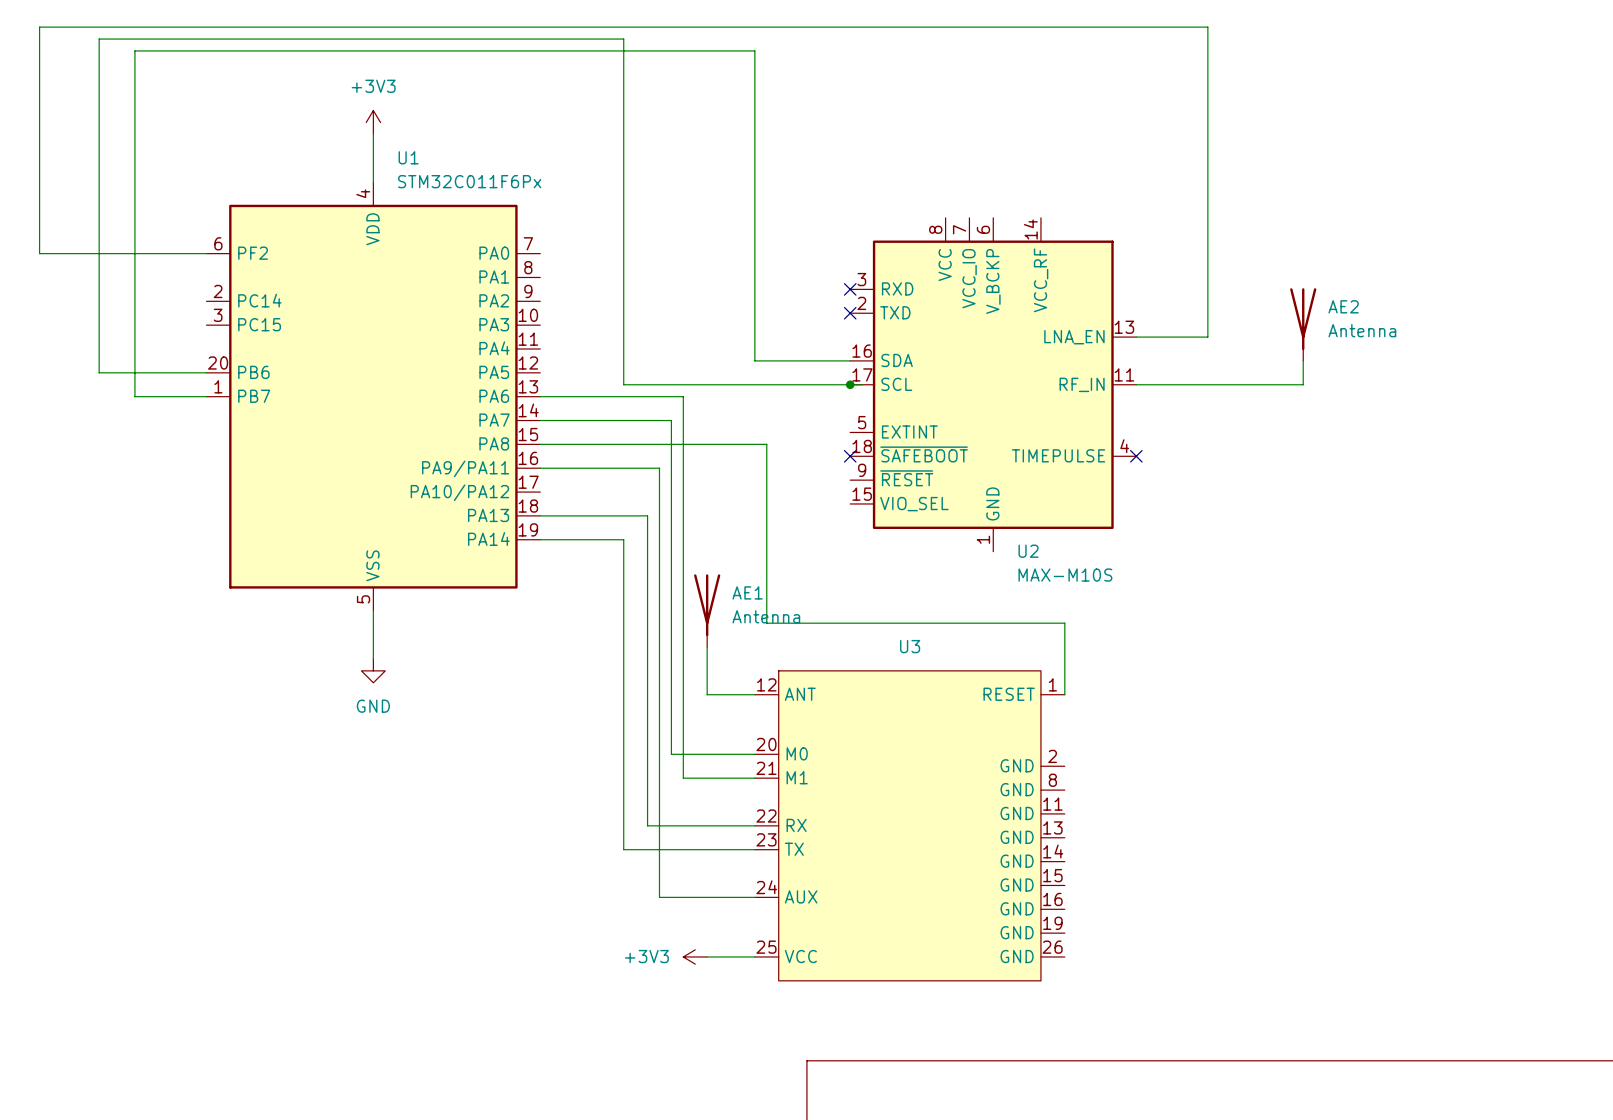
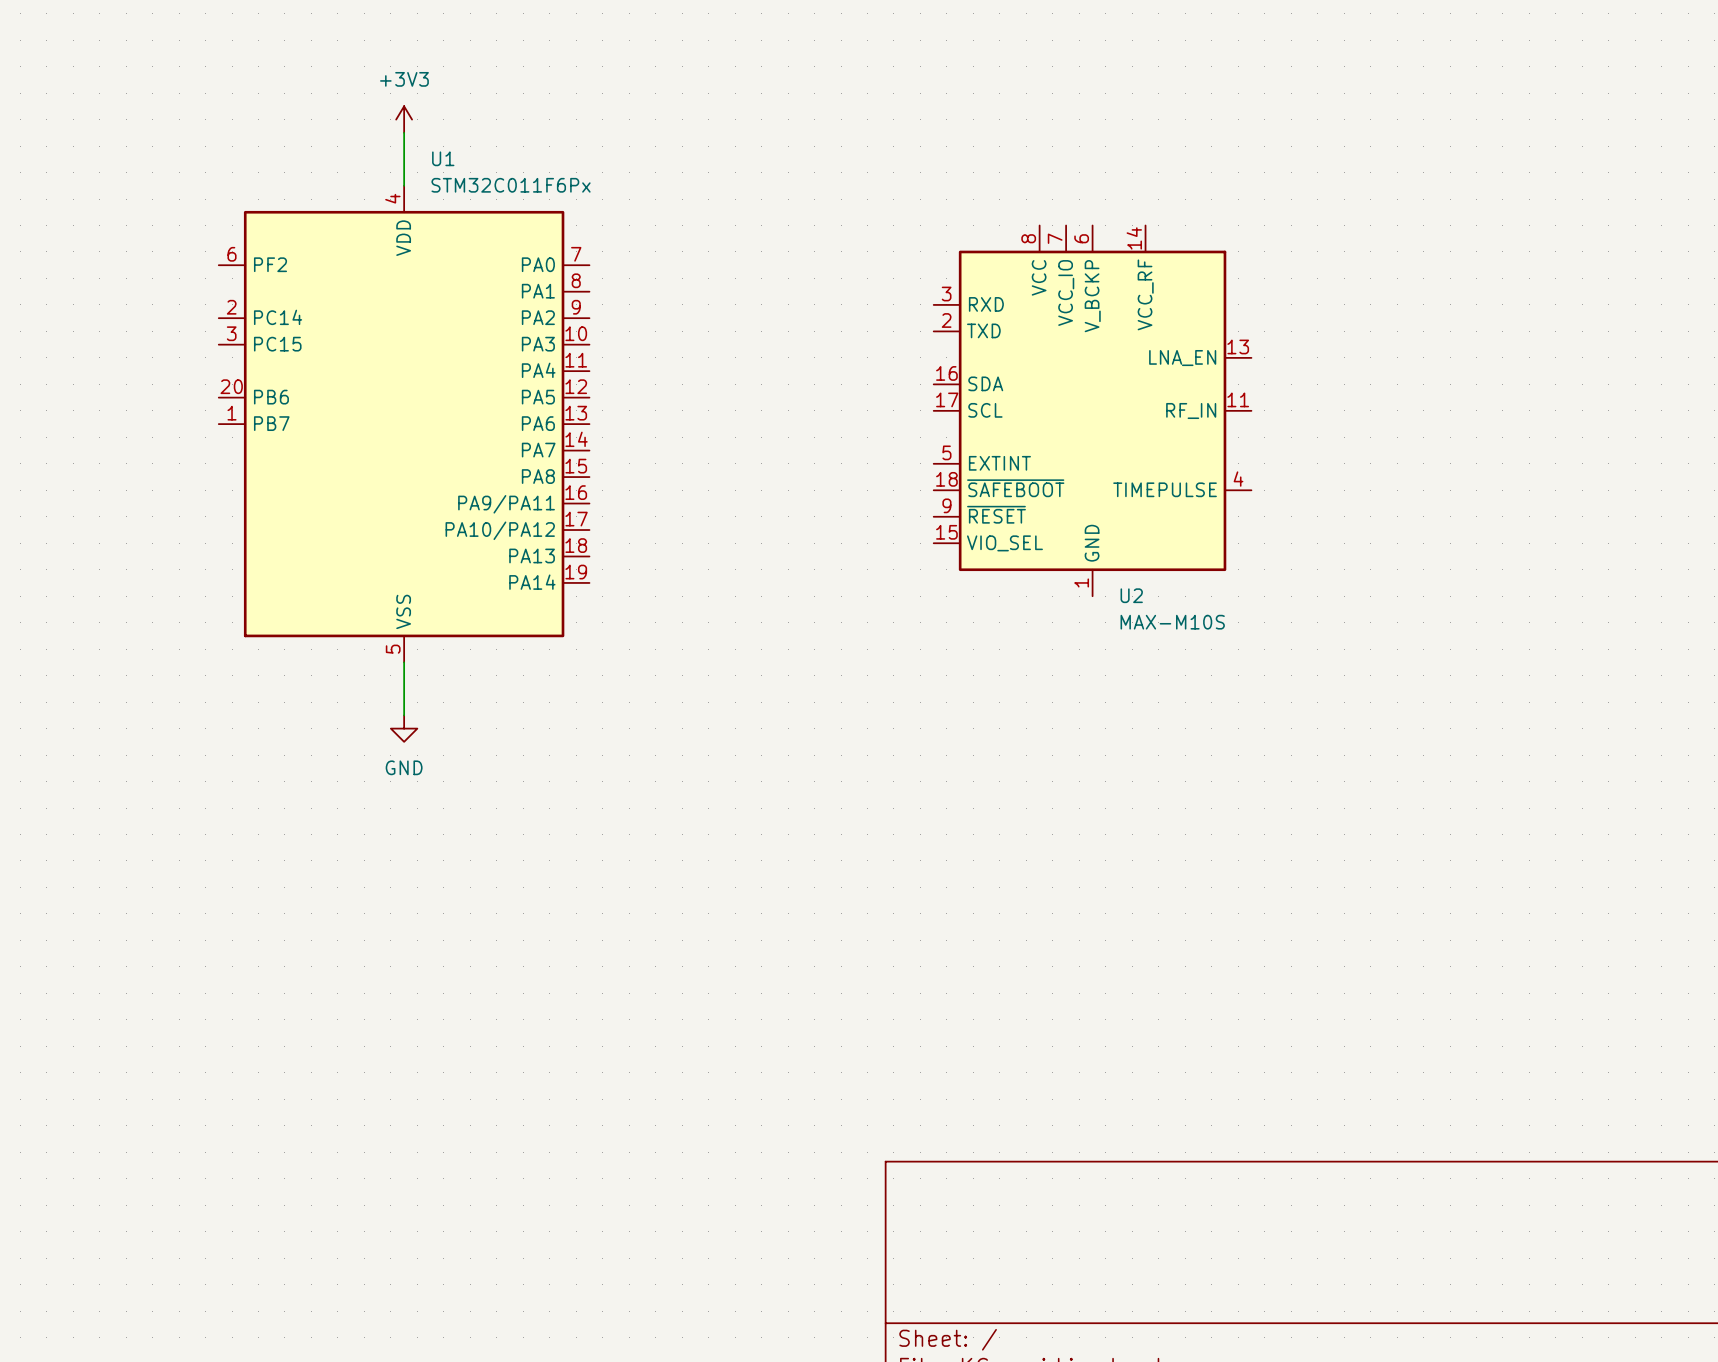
wire: (206, 253) (39, 253) (39, 27) (1207, 27) (1207, 337) (1136, 337) -> none
no-connect mark: (850, 289) -> none
no-connect mark: (850, 313) -> none
AE2: Antenna (1303, 324) -> none
wire: (850, 360) (754, 360) (754, 50) (134, 50) (134, 396) (206, 396) -> none
wire: (1303, 360) (1303, 384) (1136, 384) -> none
wire: (206, 372) (99, 372) (99, 39) (623, 39) (623, 384) (862, 384) -> none
junction: (850, 384) -> none
wire: (540, 396) (683, 396) (683, 778) (754, 778) -> none
wire: (540, 420) (671, 420) (671, 754) (754, 754) -> none
wire: (540, 444) (766, 444) (766, 623) (1064, 623) (1064, 694) -> none
no-connect mark: (850, 456) -> none
no-connect mark: (1136, 456) -> none
wire: (540, 468) (659, 468) (659, 897) (754, 897) -> none
wire: (540, 515) (647, 515) (647, 825) (754, 825) -> none
wire: (540, 539) (623, 539) (623, 849) (754, 849) -> none
AE1: Antenna (707, 610) -> none
wire: (707, 647) (707, 694) (754, 694) -> none
U3: (909, 825) -> none
power symbol: +3V3 (695, 956) -> none
wire: (707, 956) (754, 956) -> none

